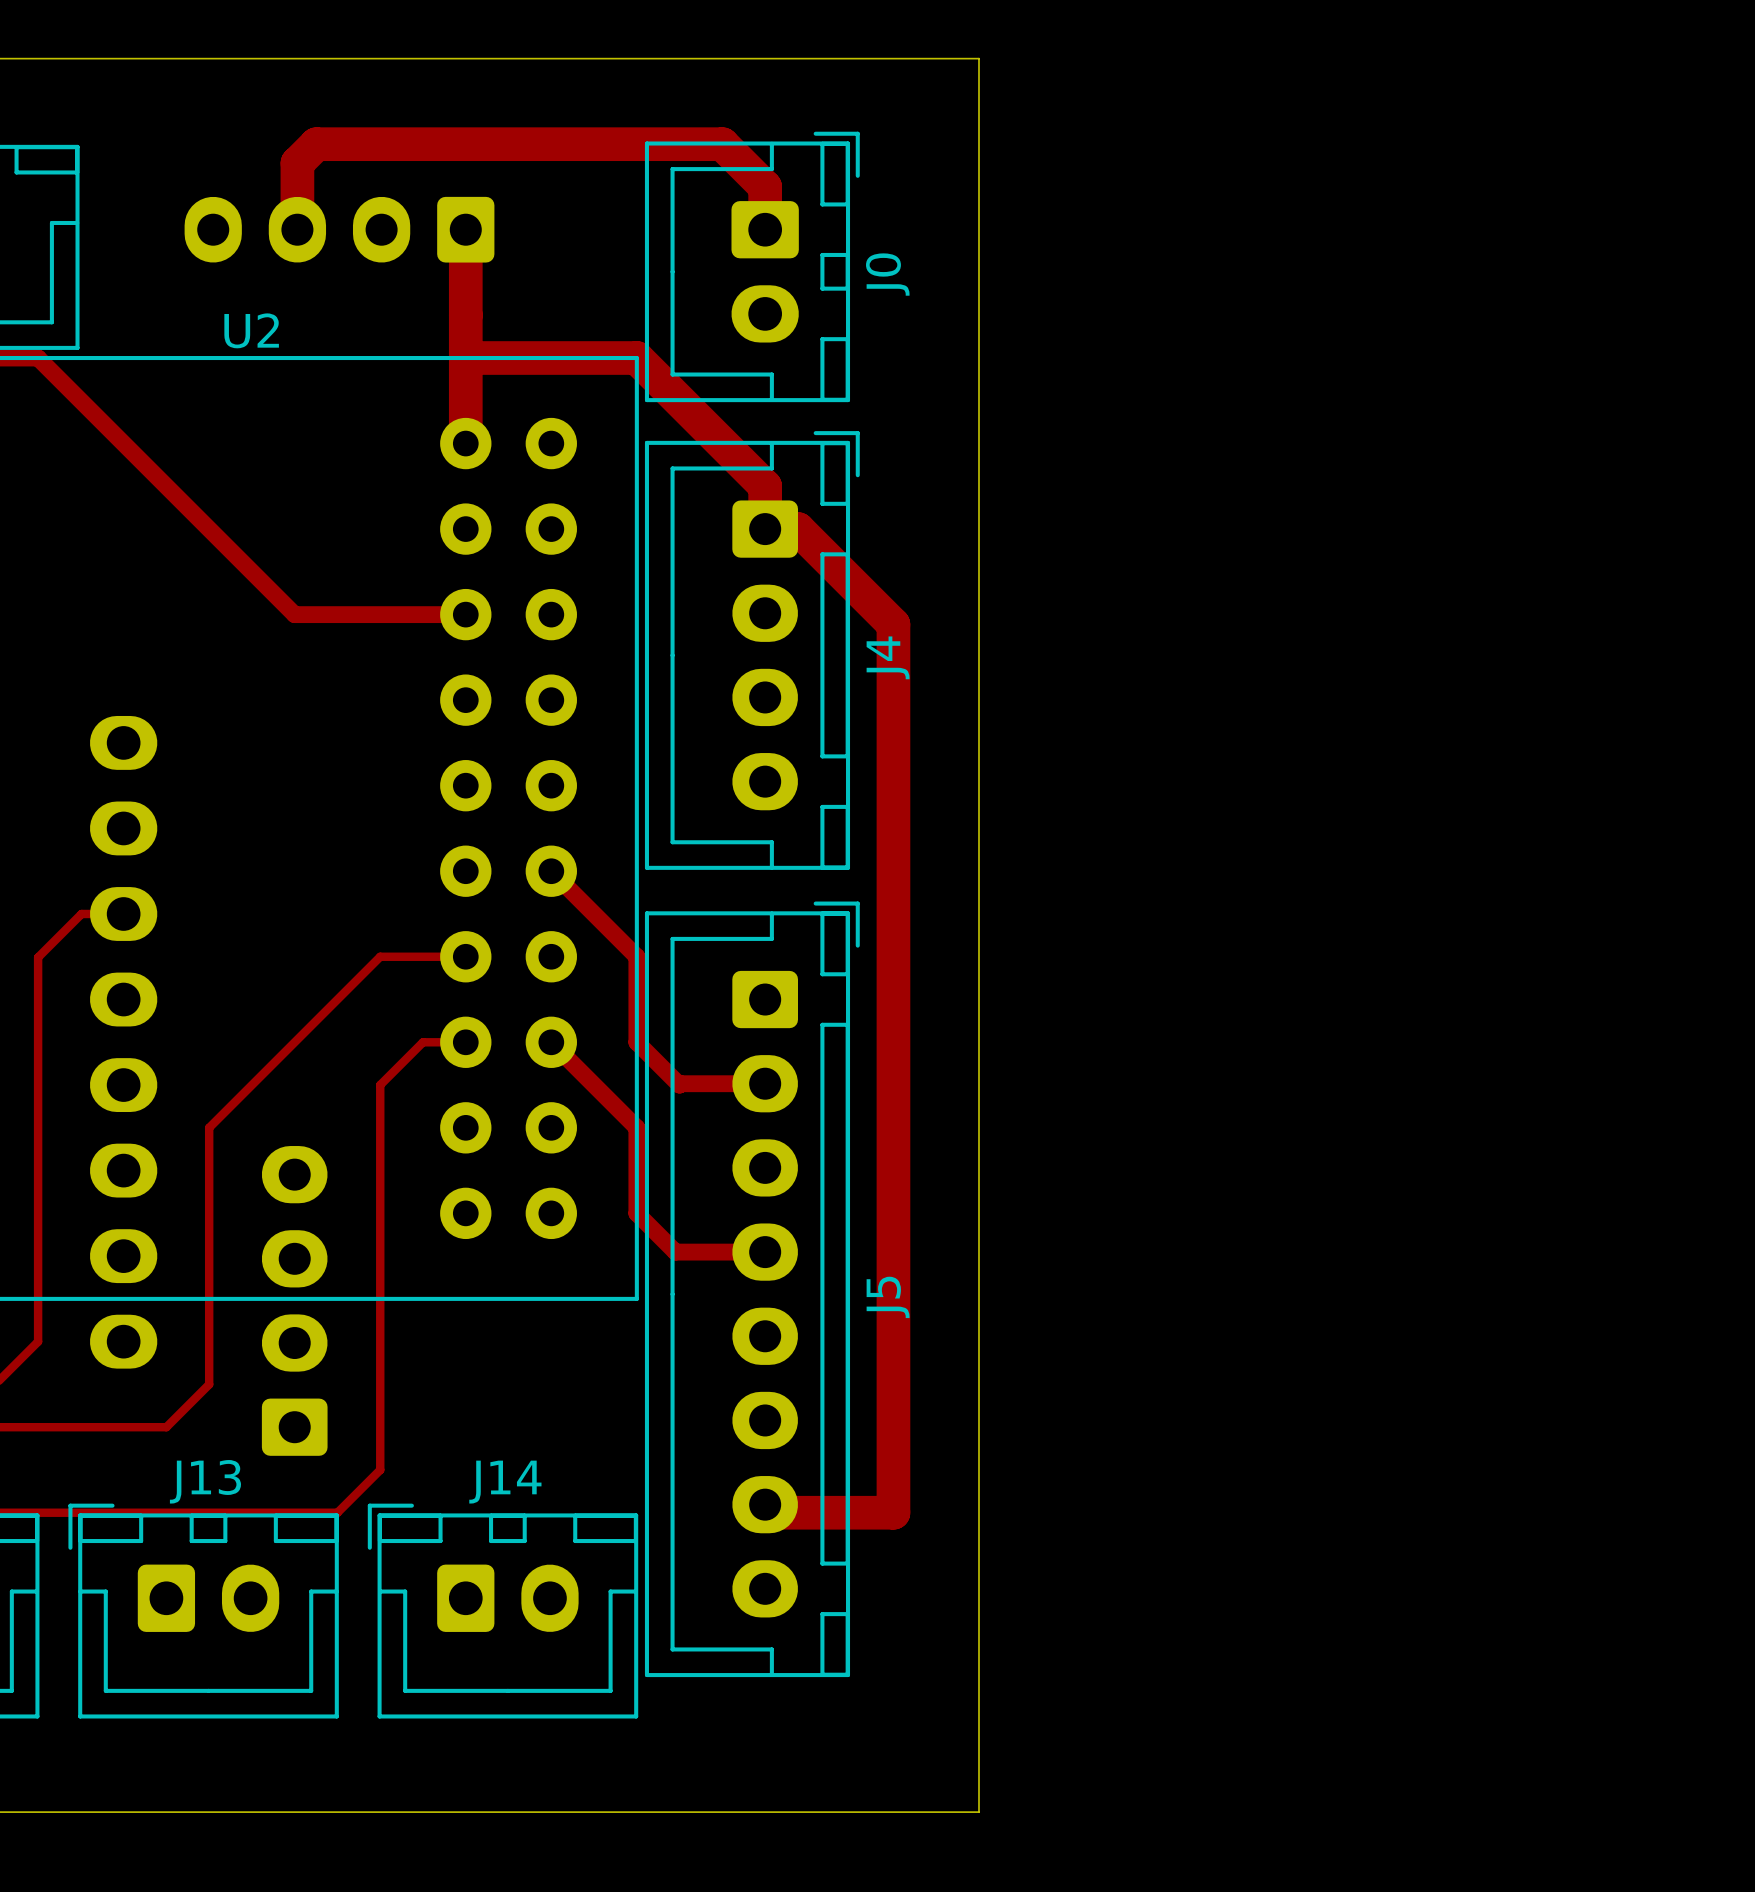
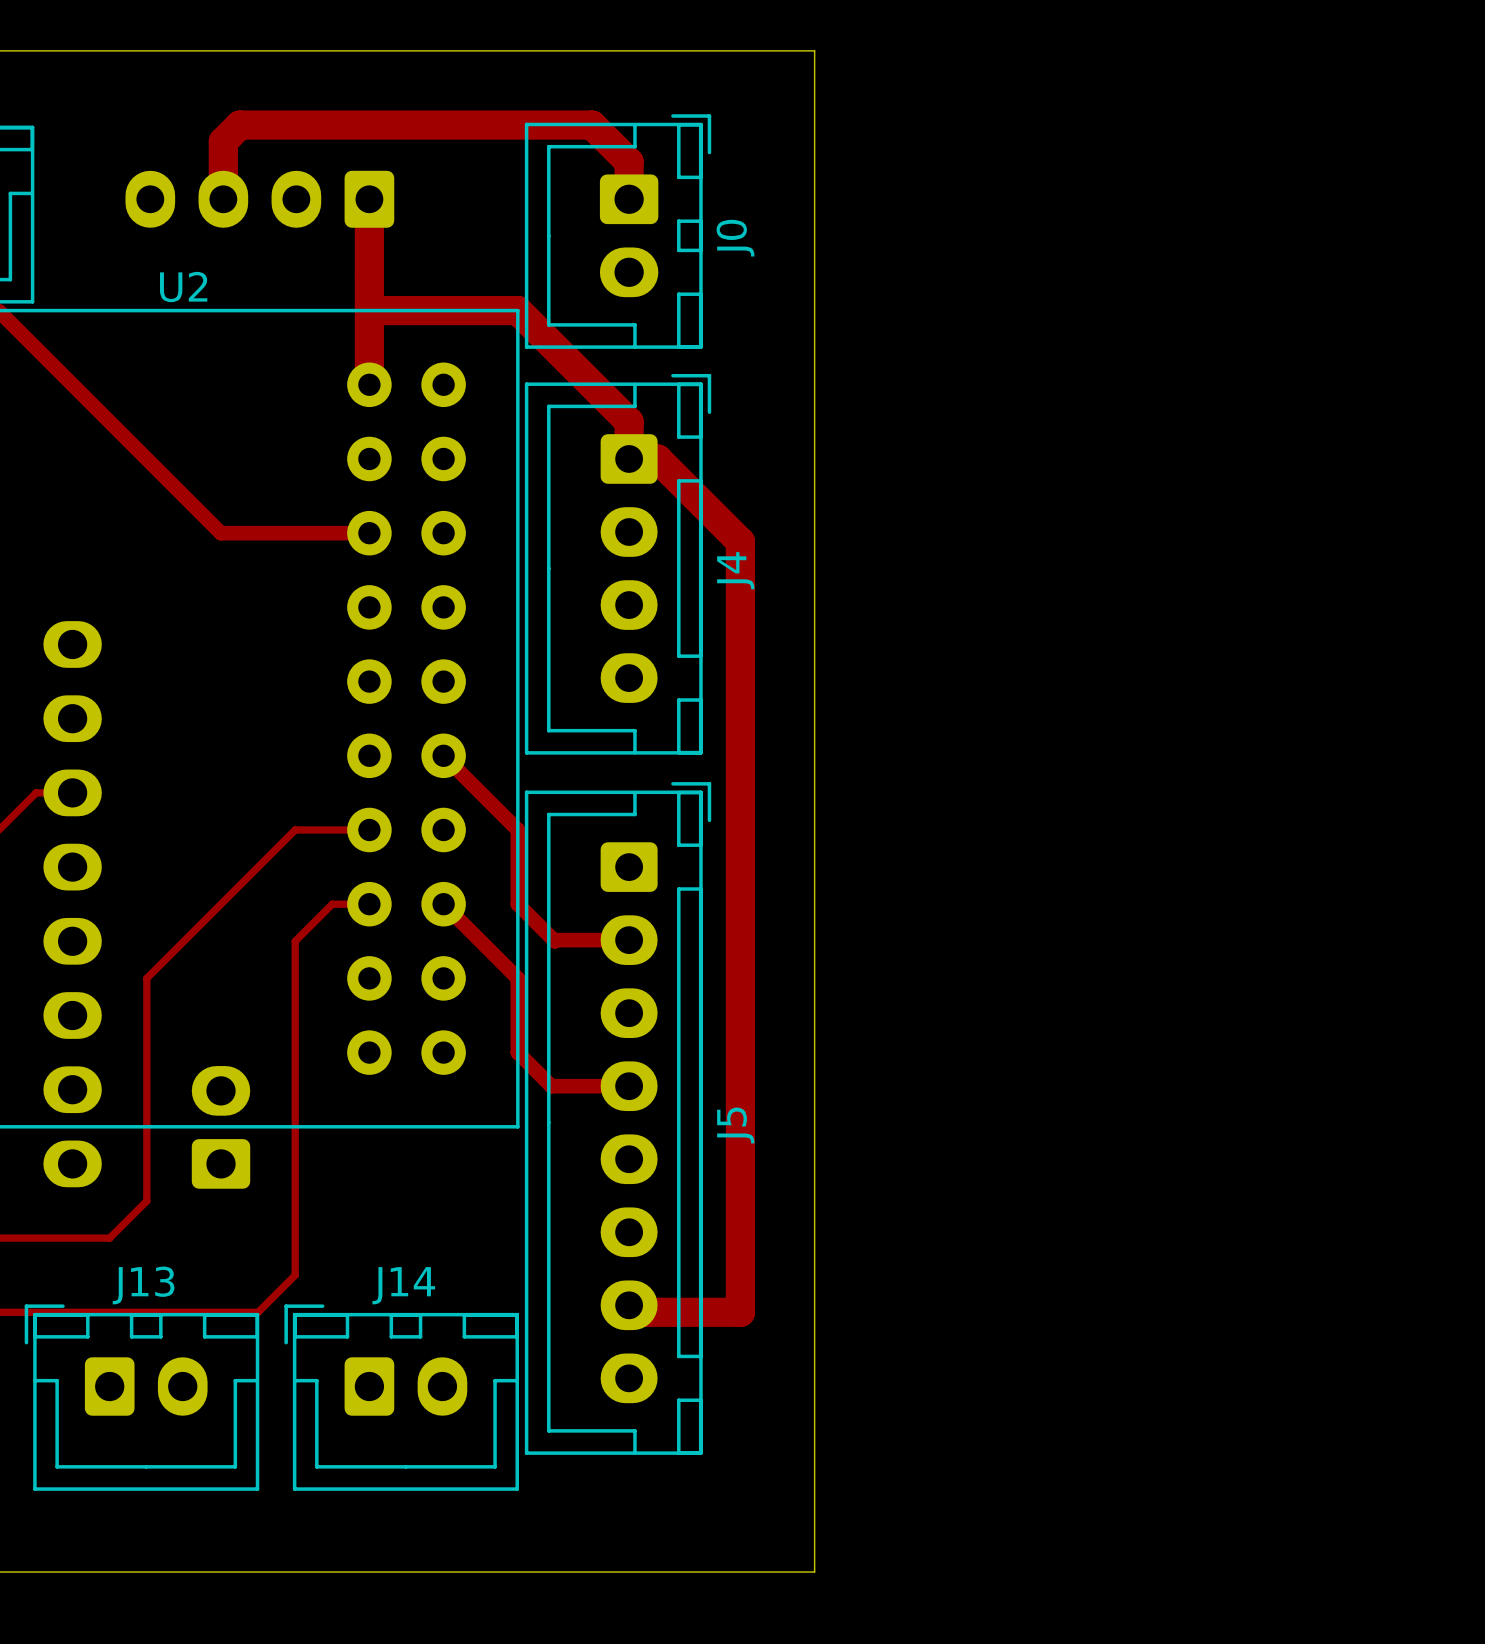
part footprint: [261, 1146, 328, 1456] -> [191, 1066, 251, 1189]

